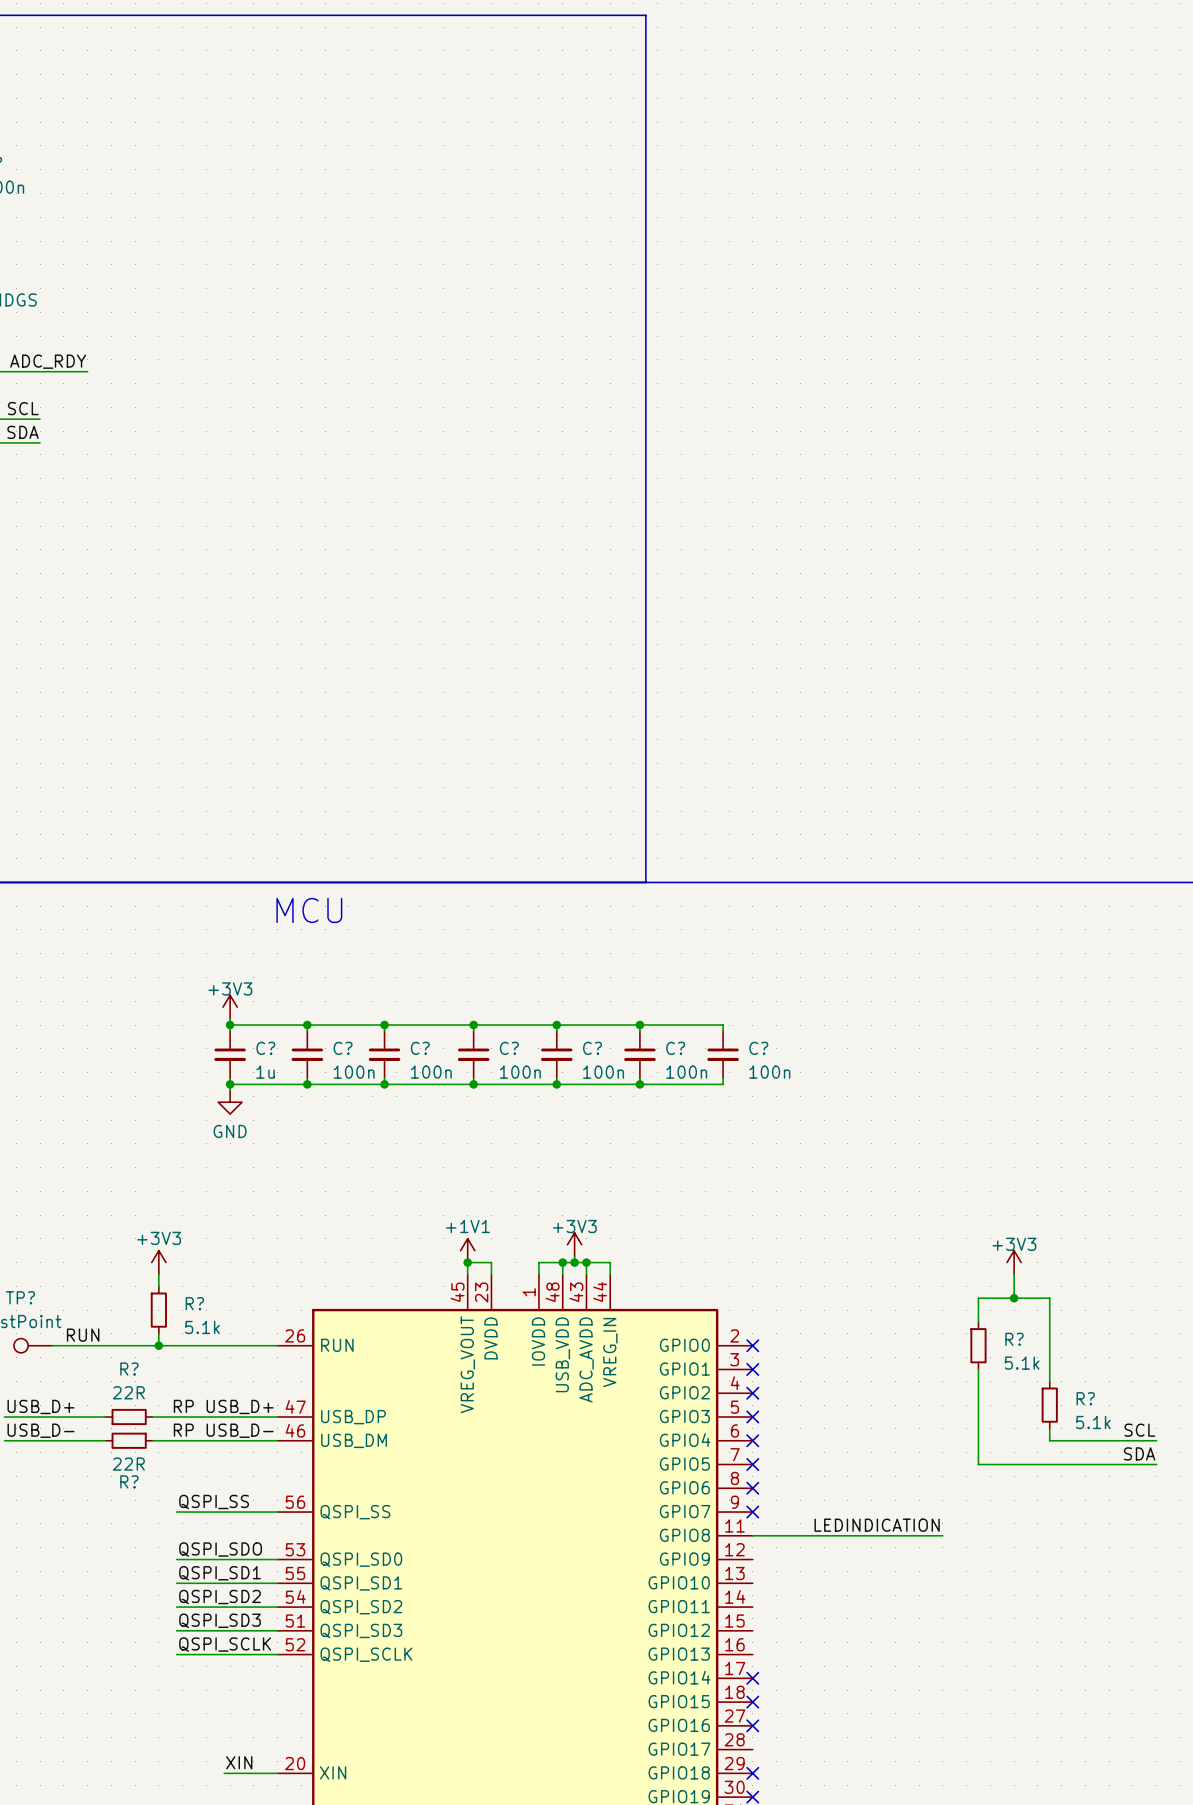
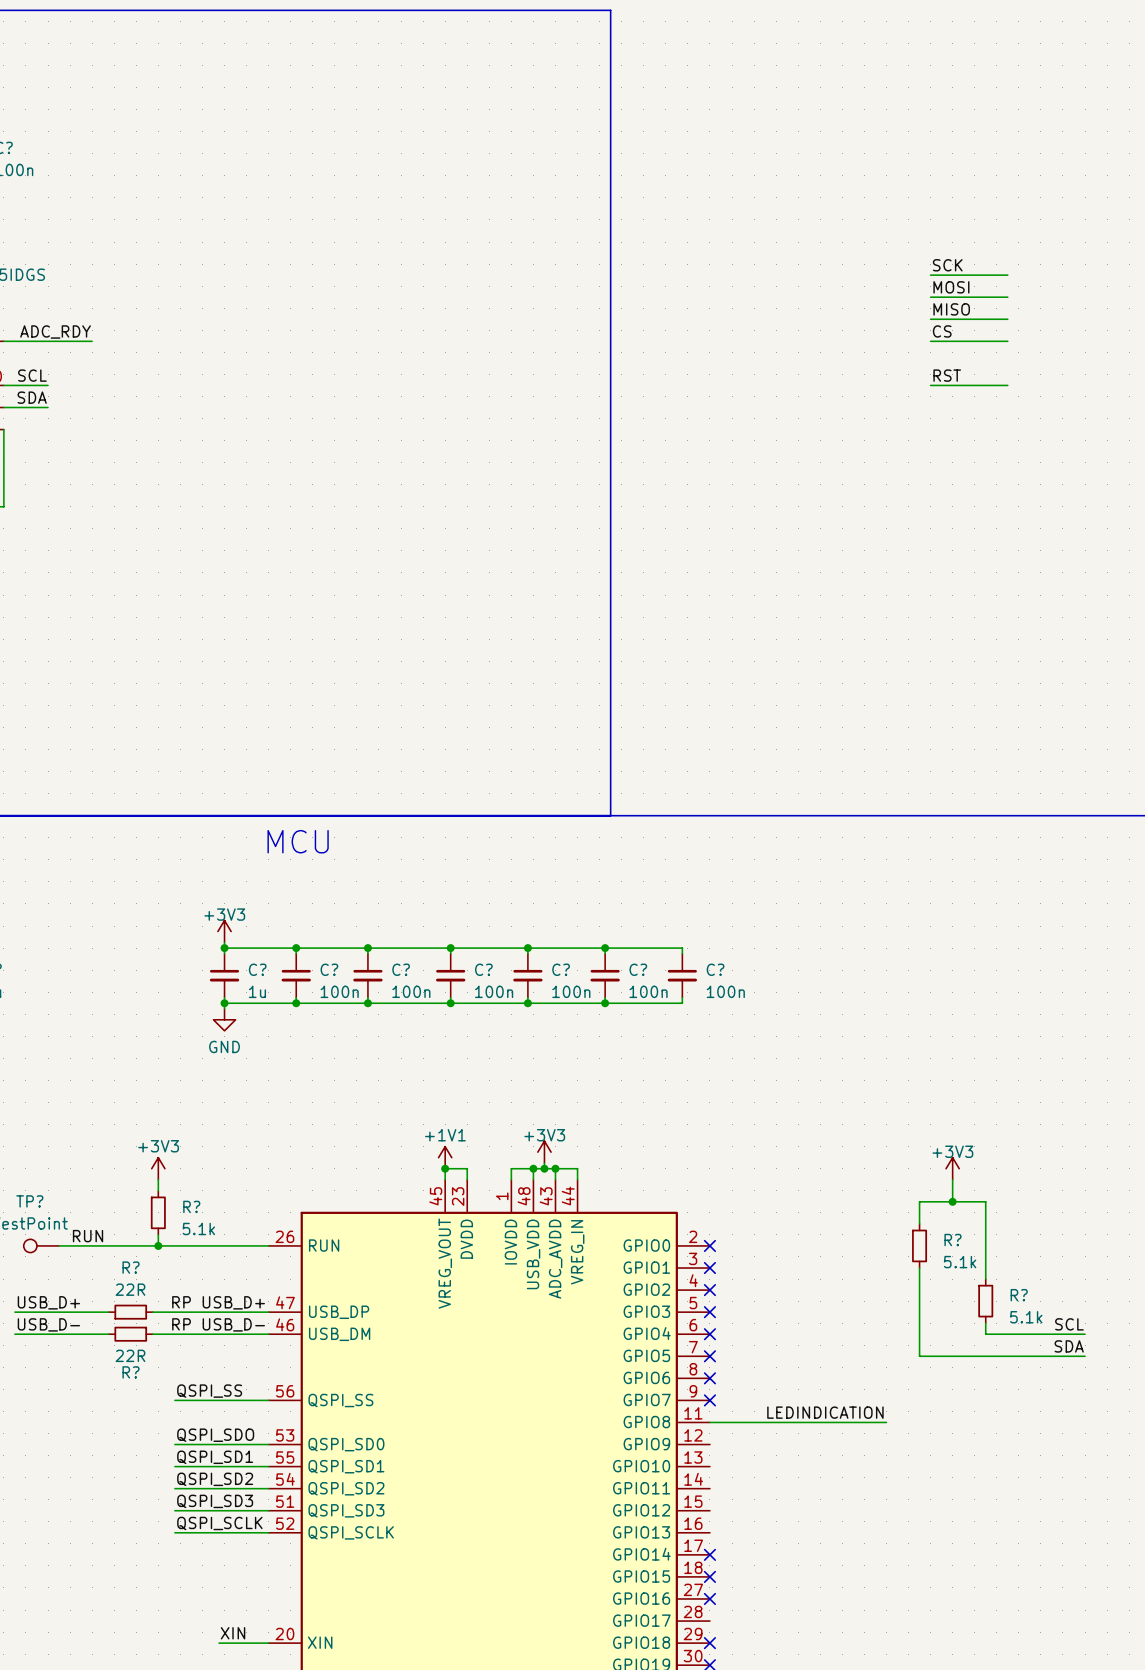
label: none -> SCK (947, 265)
wire: none -> (930, 275) (1007, 275)
label: none -> MOSI (951, 287)
wire: none -> (930, 297) (1007, 297)
label: none -> MISO (951, 309)
wire: none -> (930, 319) (1007, 319)
label: none -> CS (942, 331)
wire: none -> (930, 341) (1007, 341)
label: none -> RST (947, 375)
wire: none -> (930, 385) (1007, 385)

